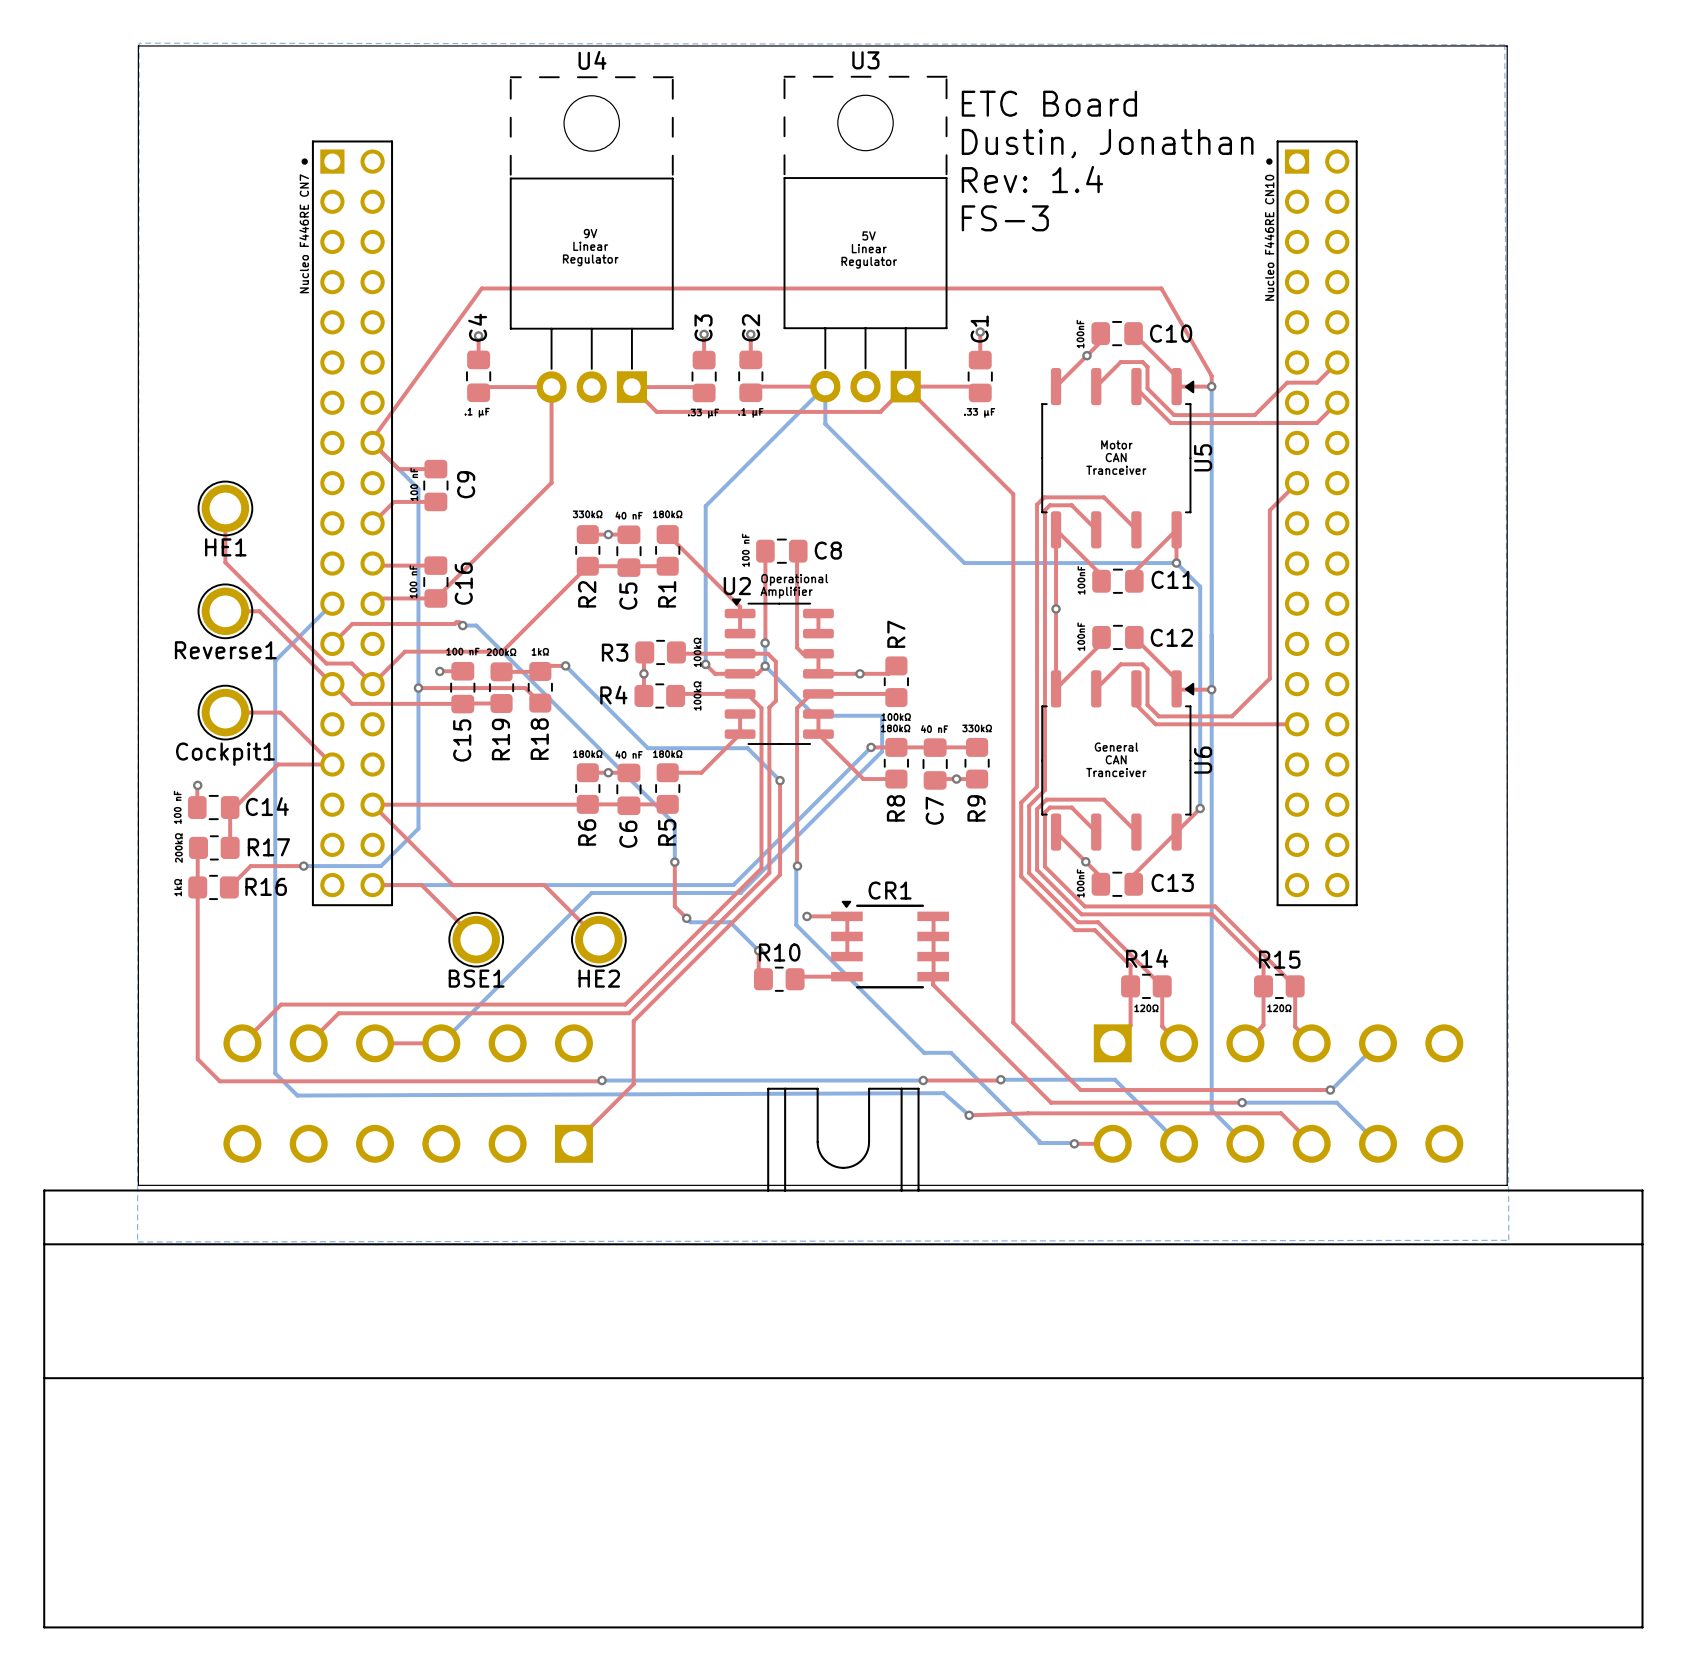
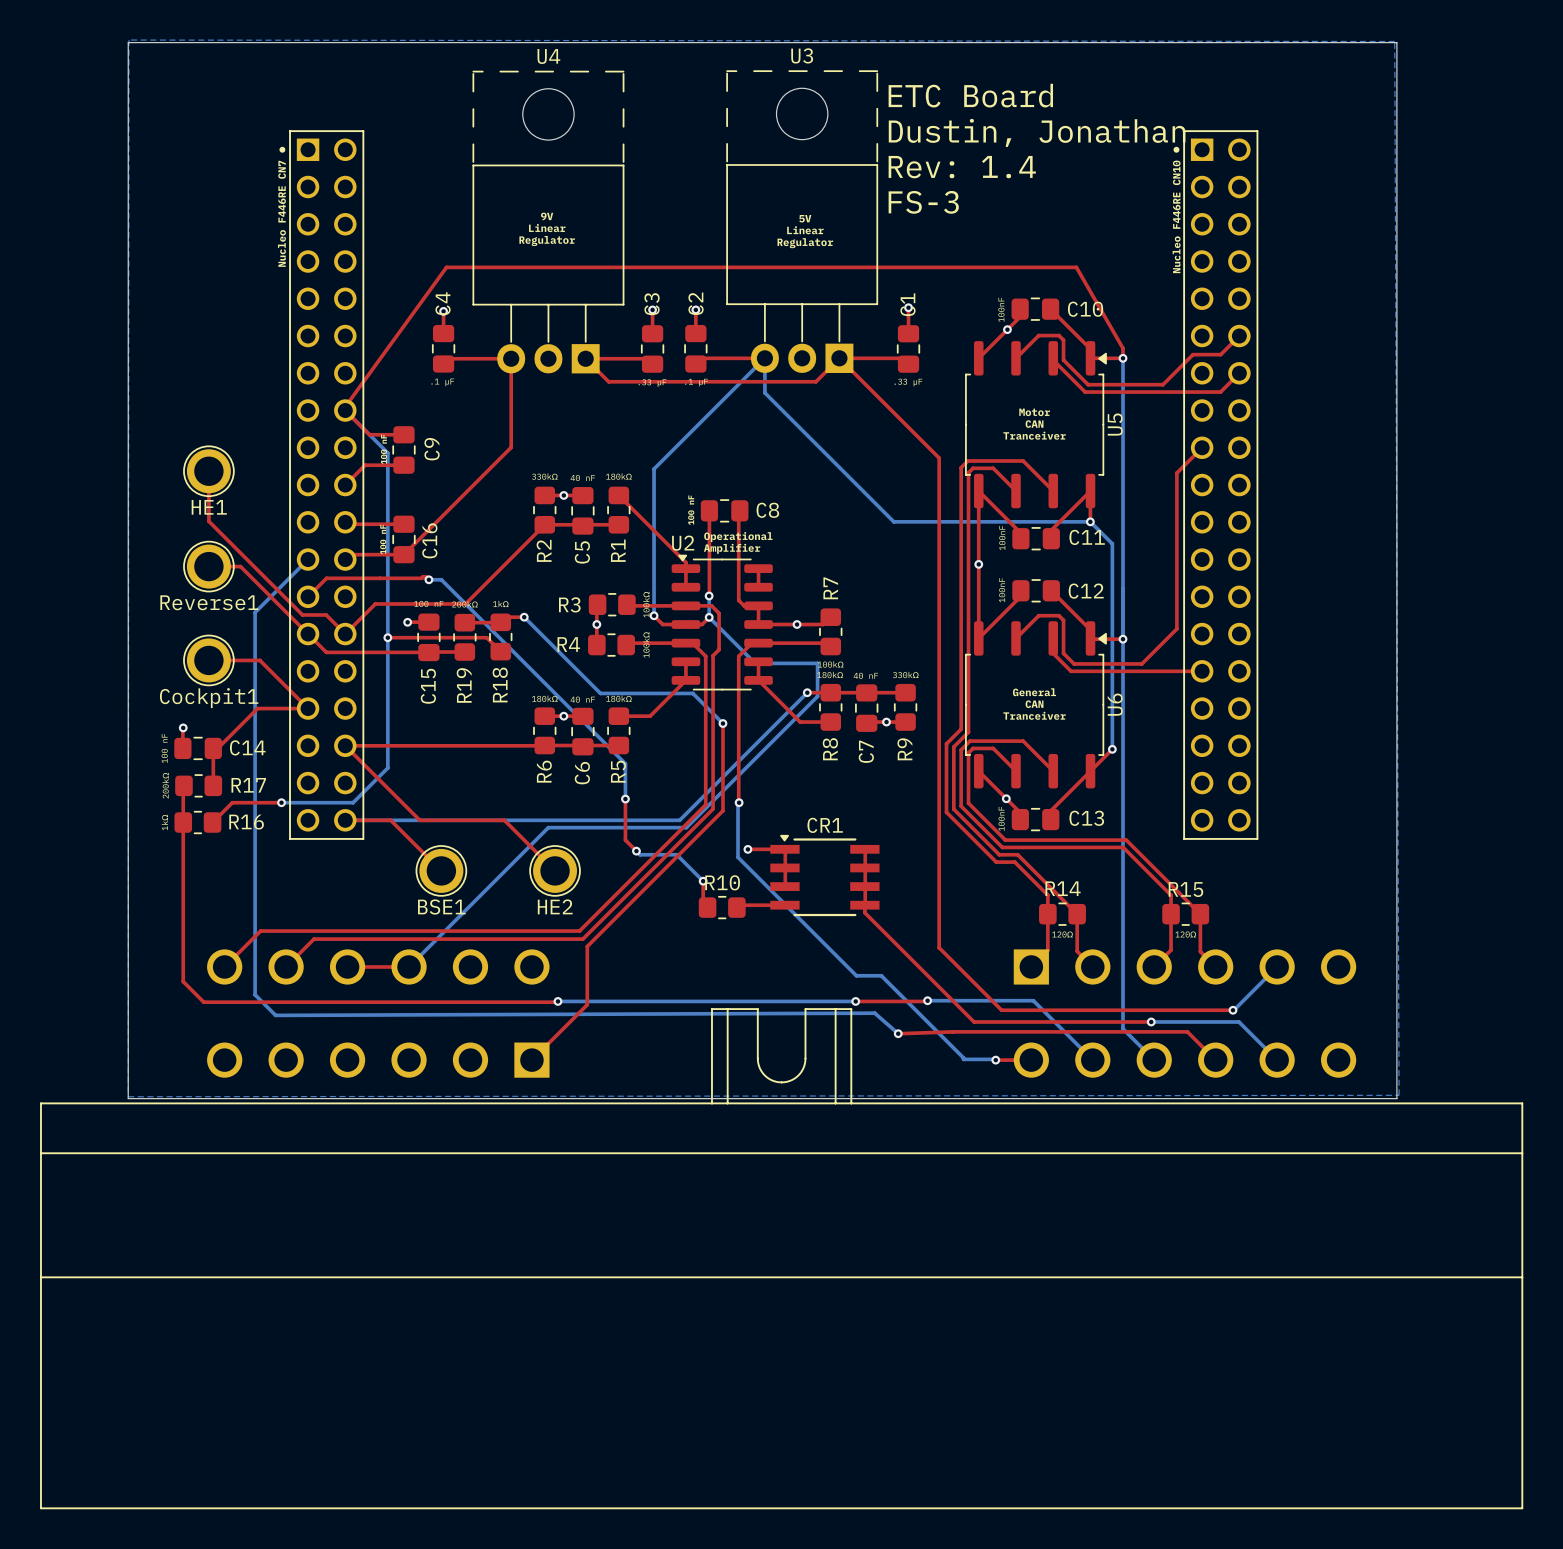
bottom zone outline: (139, 43) (137, 1241) (1508, 1240) (1504, 44) -> (128, 40) (128, 1096) (1399, 1095) (1394, 41)

